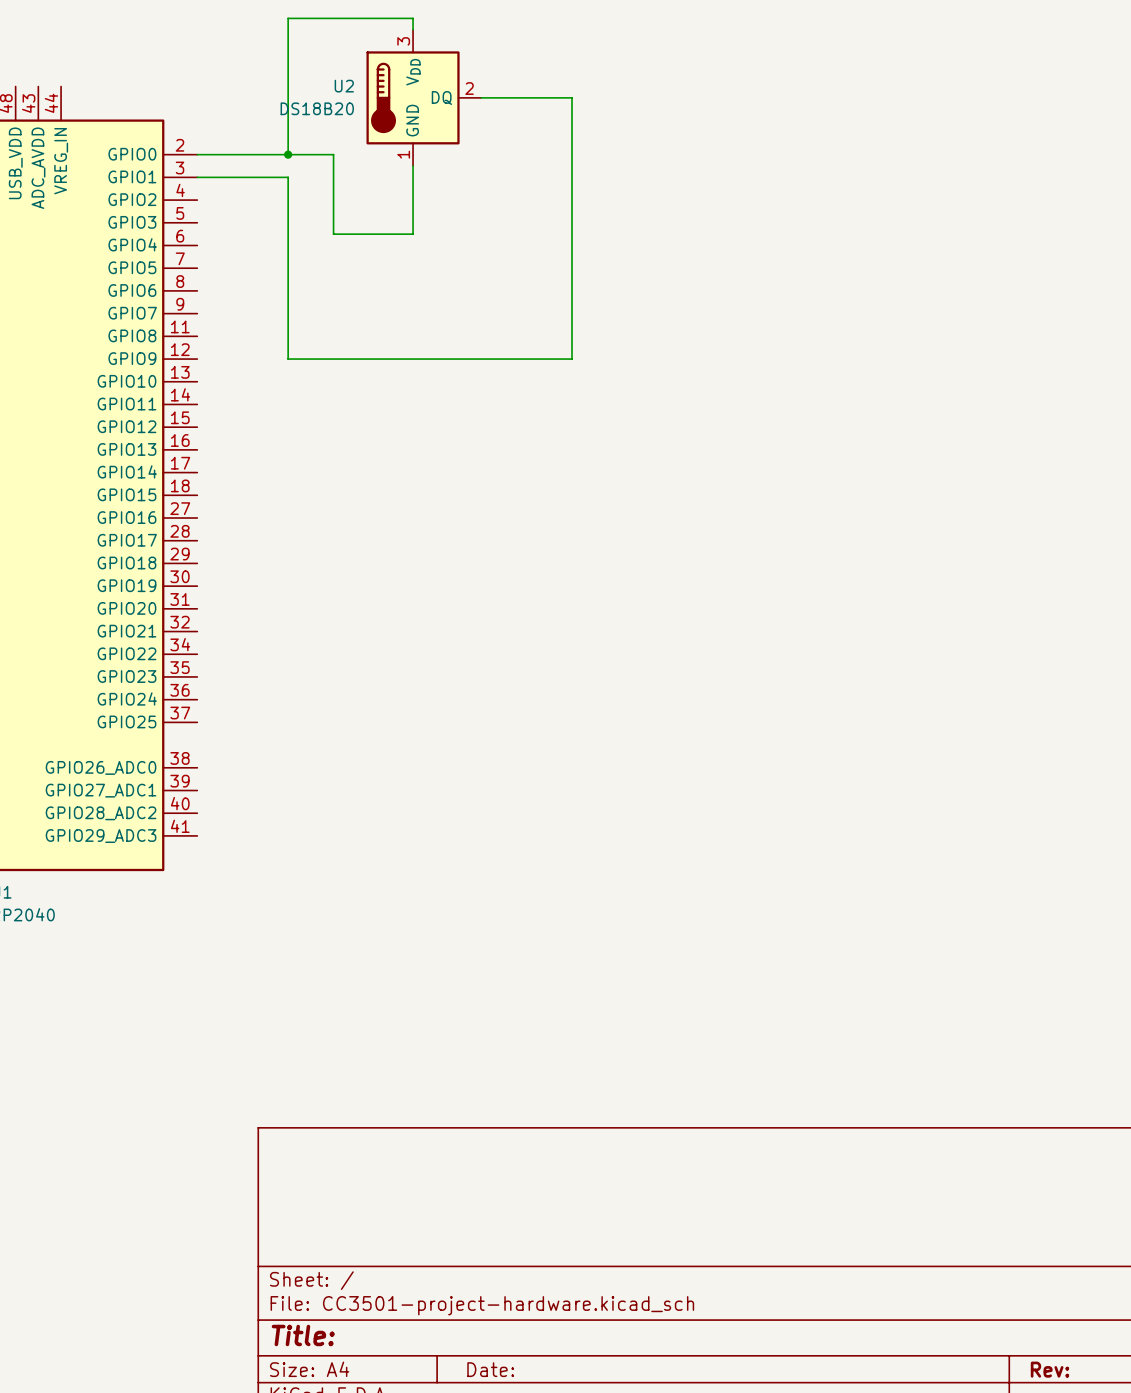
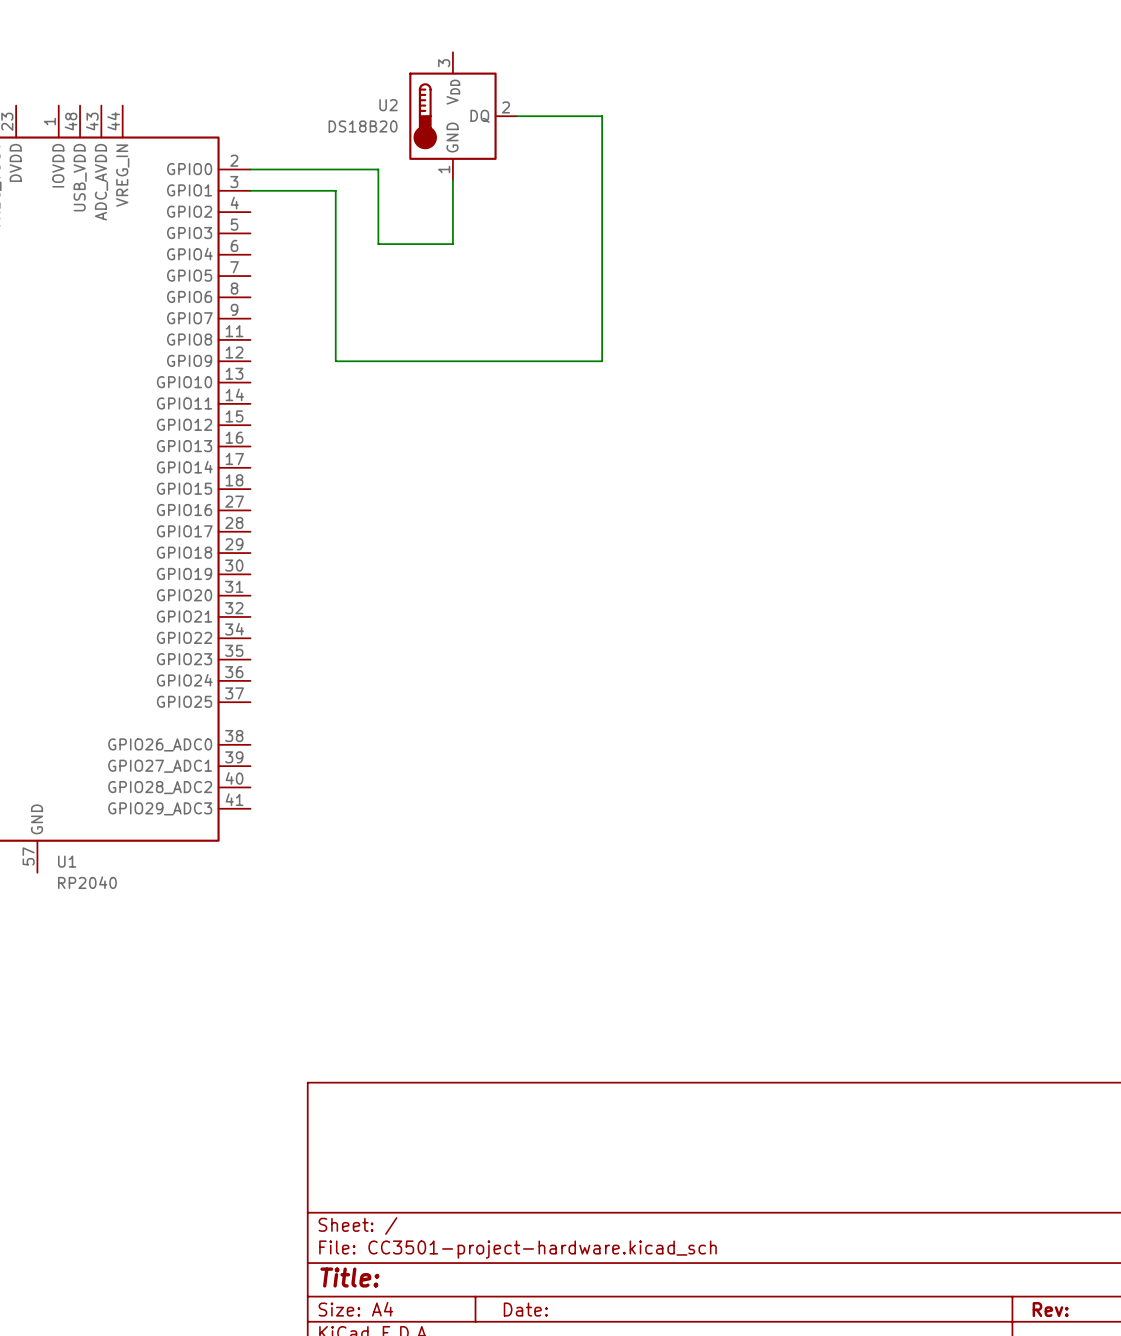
wire: (413, 29) (413, 18) (288, 18) (288, 154) -> none
junction: (288, 154) -> none

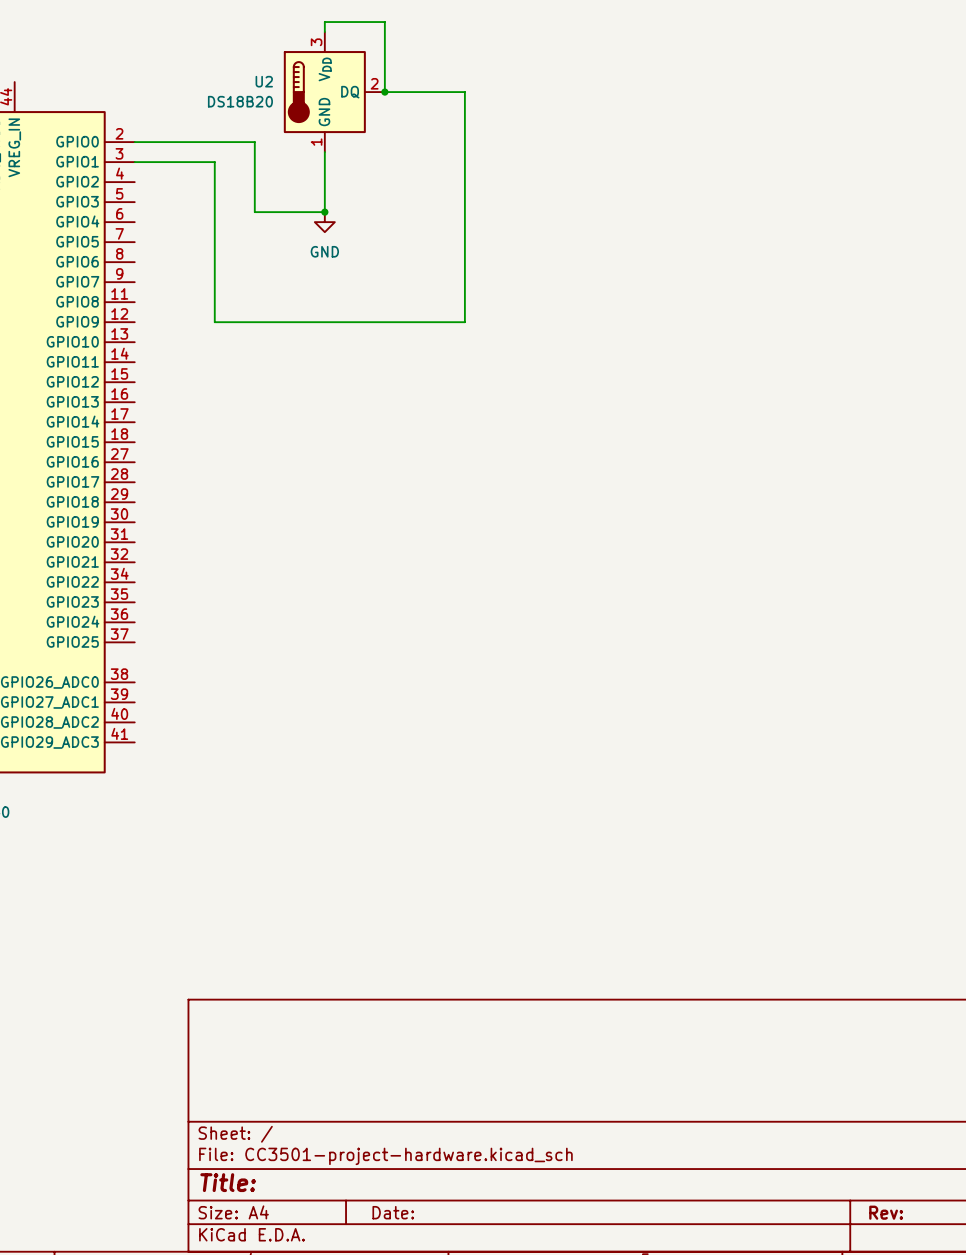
wire: none -> (324, 32) (324, 22) (384, 22) (384, 92)
junction: none -> (384, 92)
junction: none -> (324, 212)
power symbol: none -> GND (324, 222)

